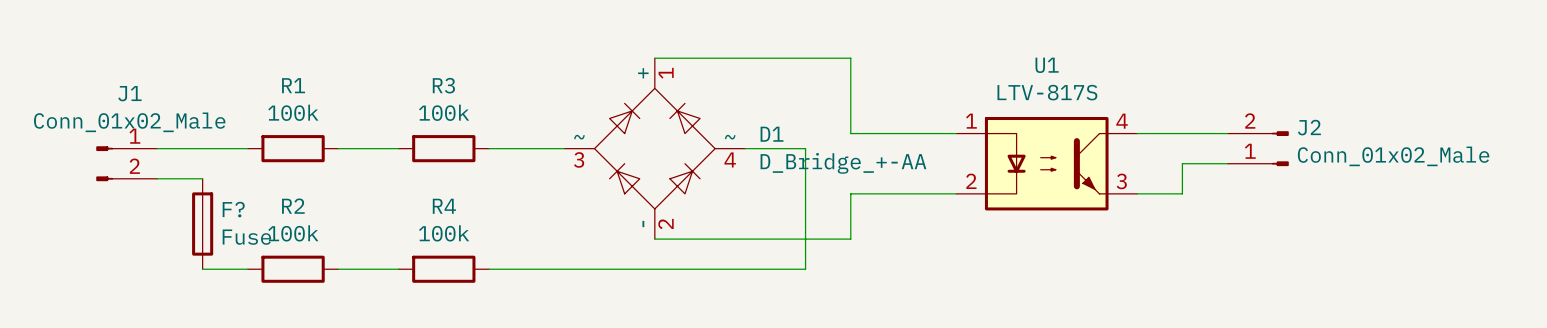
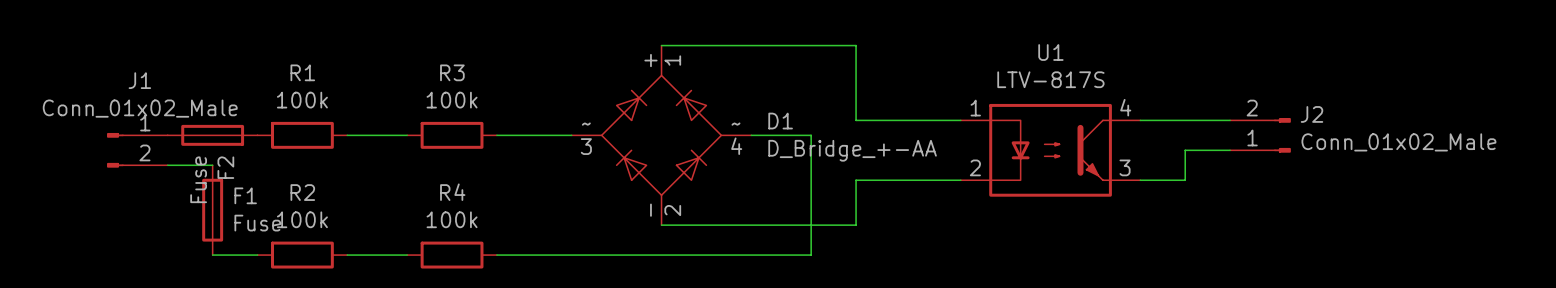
F2: none -> Fuse (212, 135)
F? name: F? (233, 209) -> F1 (245, 195)

